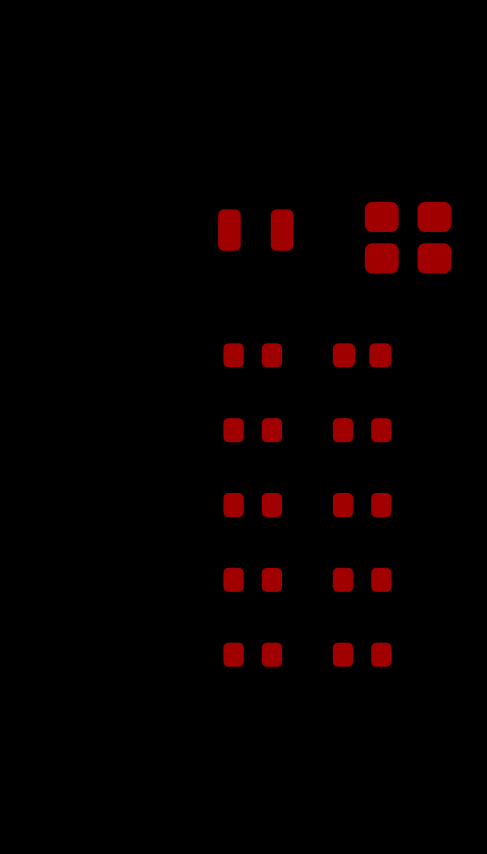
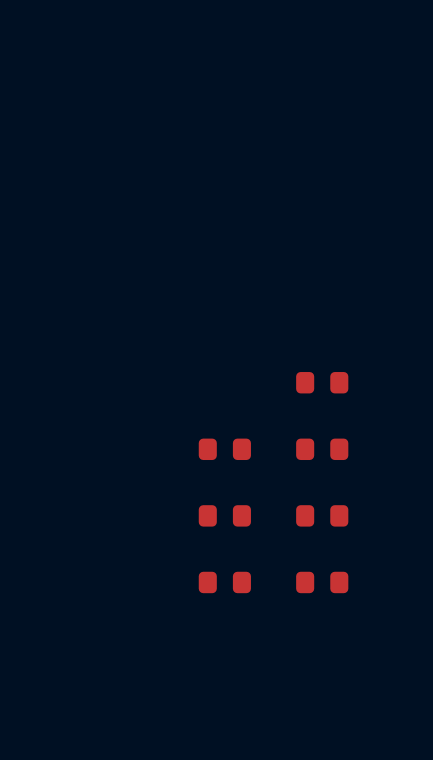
part: (255, 230) -> none
part: (408, 237) -> none
part: (252, 355) -> none
part: (362, 355) -> none
part: (252, 430) -> none

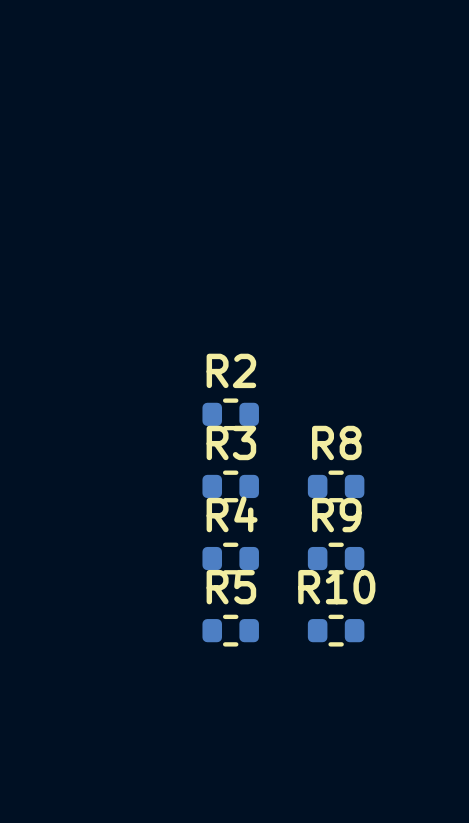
R2 side: top (322, 382) -> bottom (230, 414)
R8 side: top (224, 449) -> bottom (336, 486)
R3 side: top (322, 449) -> bottom (230, 486)
R9 side: top (224, 515) -> bottom (336, 558)
R4 side: top (322, 515) -> bottom (230, 558)
R10 side: top (224, 582) -> bottom (336, 630)
R5 side: top (322, 582) -> bottom (230, 630)

